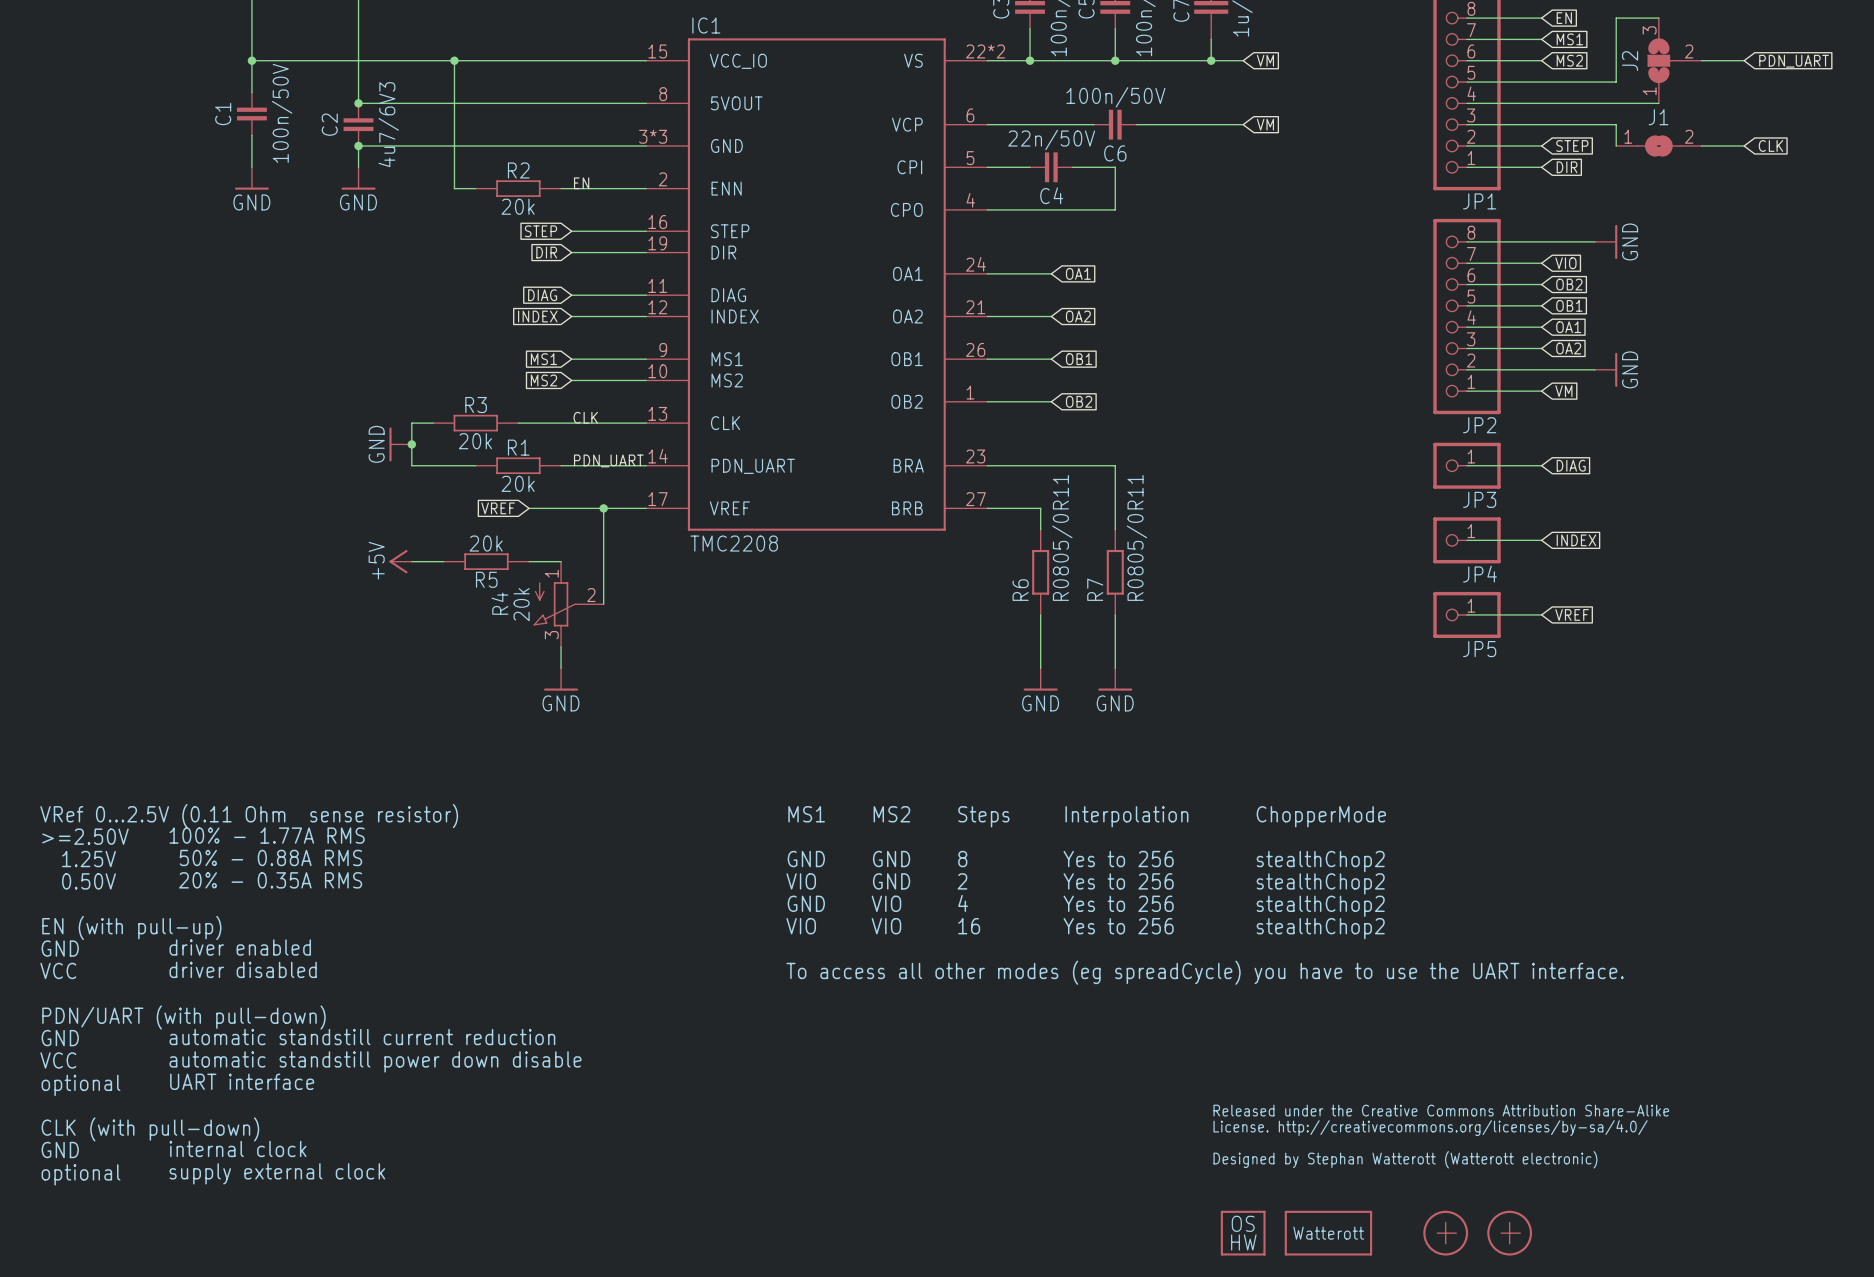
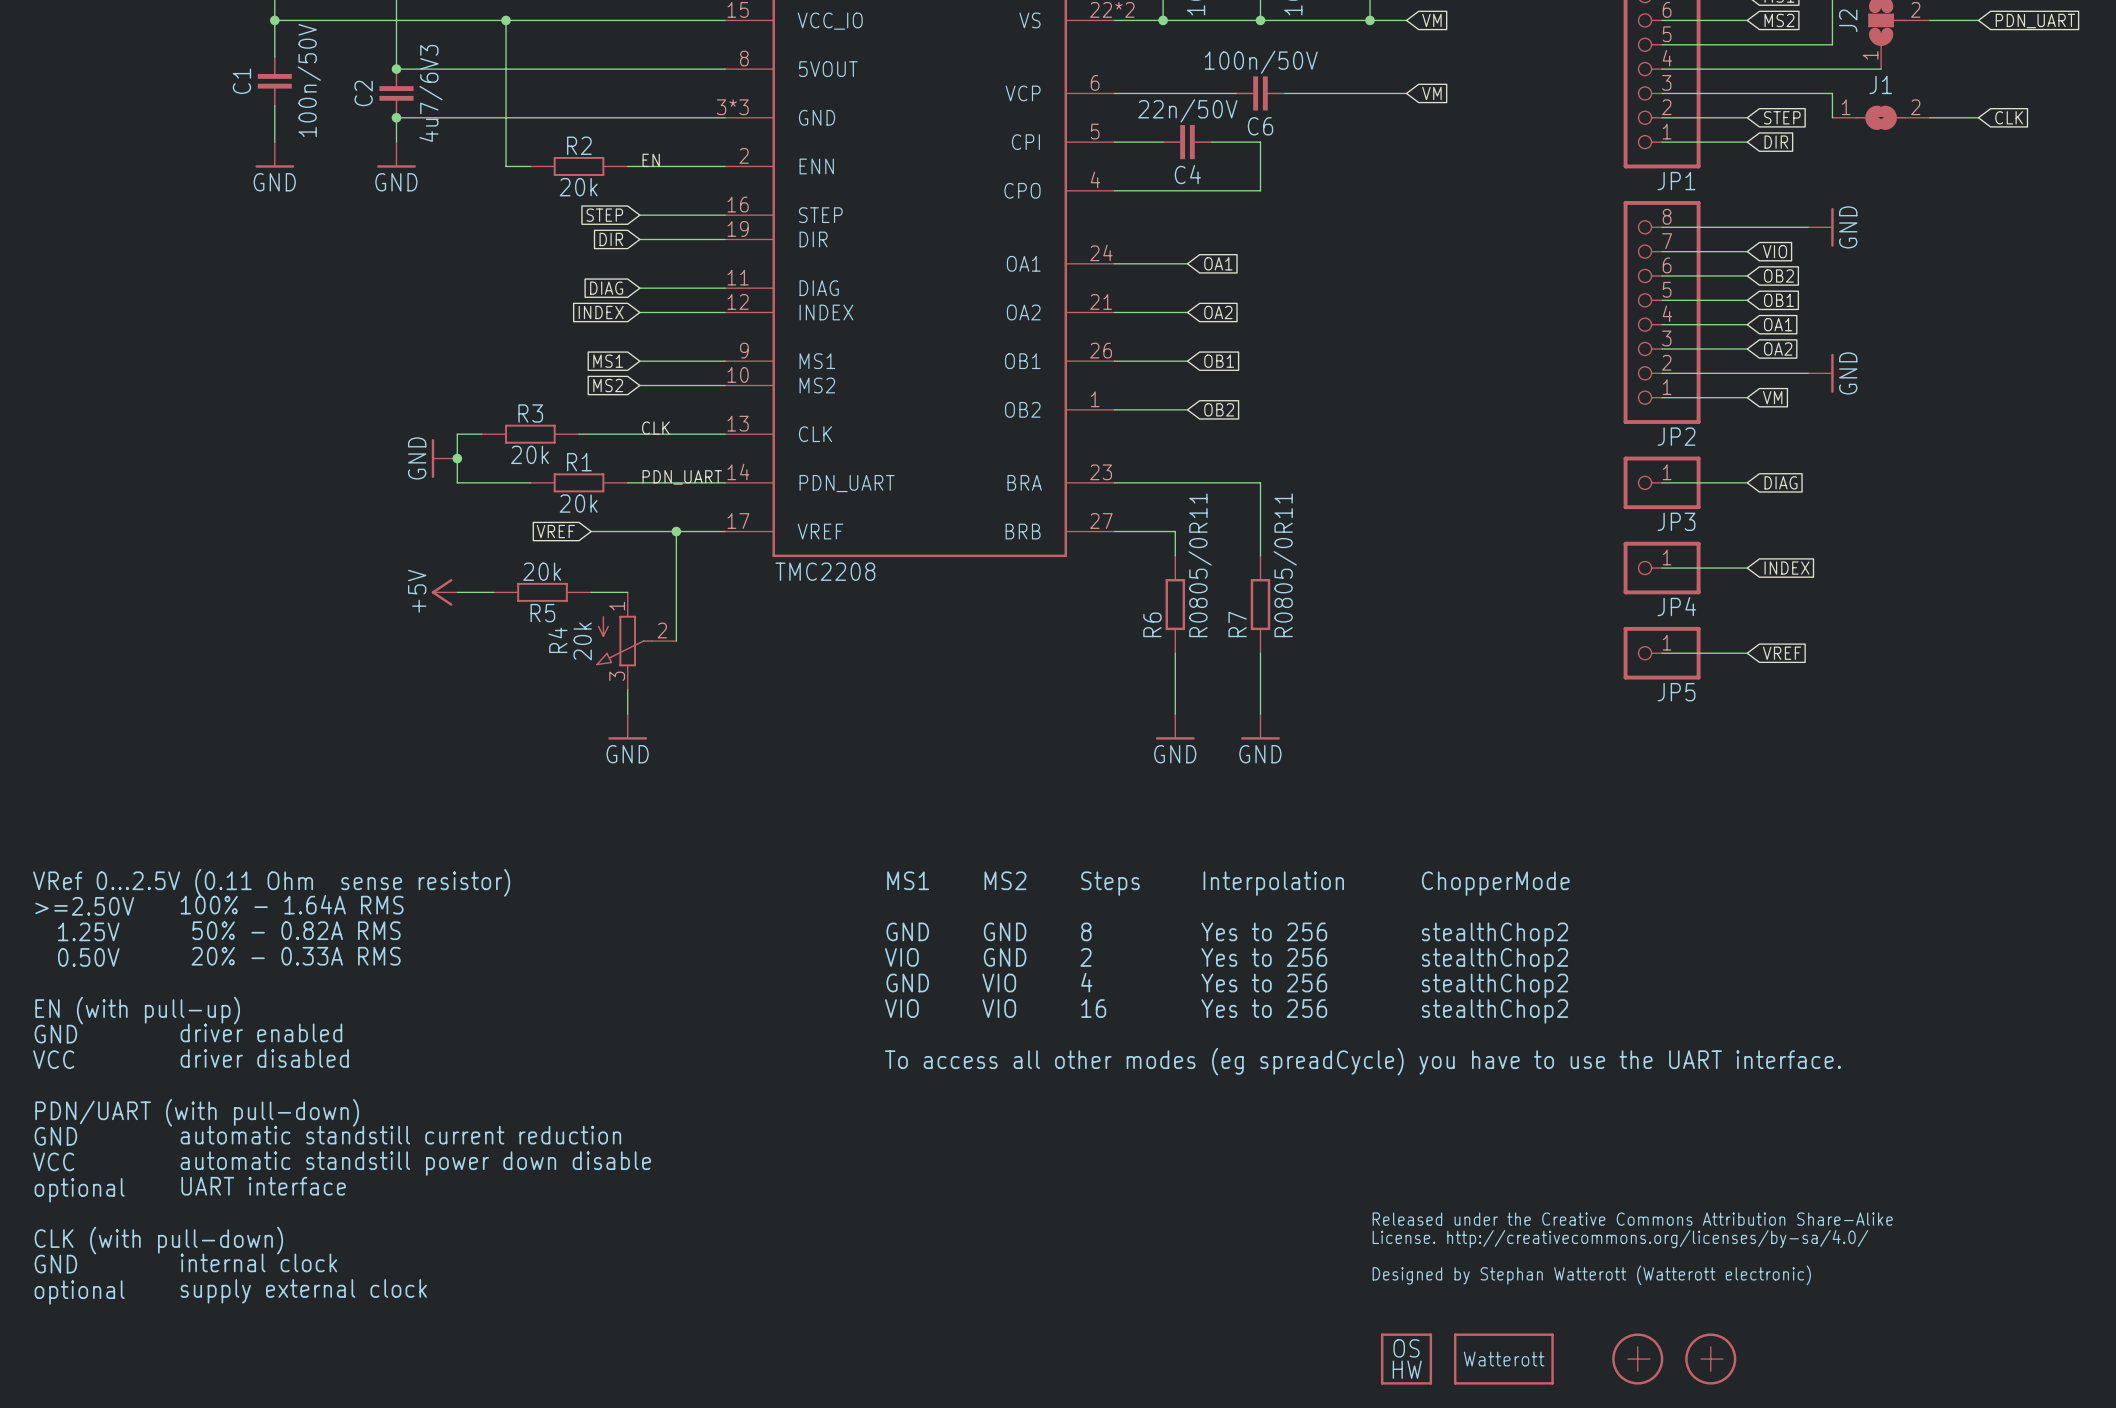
text: 100% - 1.77A RMS (267, 835) -> 100% - 1.64A RMS (292, 904)
text: 50% - 0.88A RMS (270, 857) -> 50% - 0.82A RMS (296, 930)
text: 20% - 0.35A RMS (270, 880) -> 20% - 0.33A RMS (296, 956)

